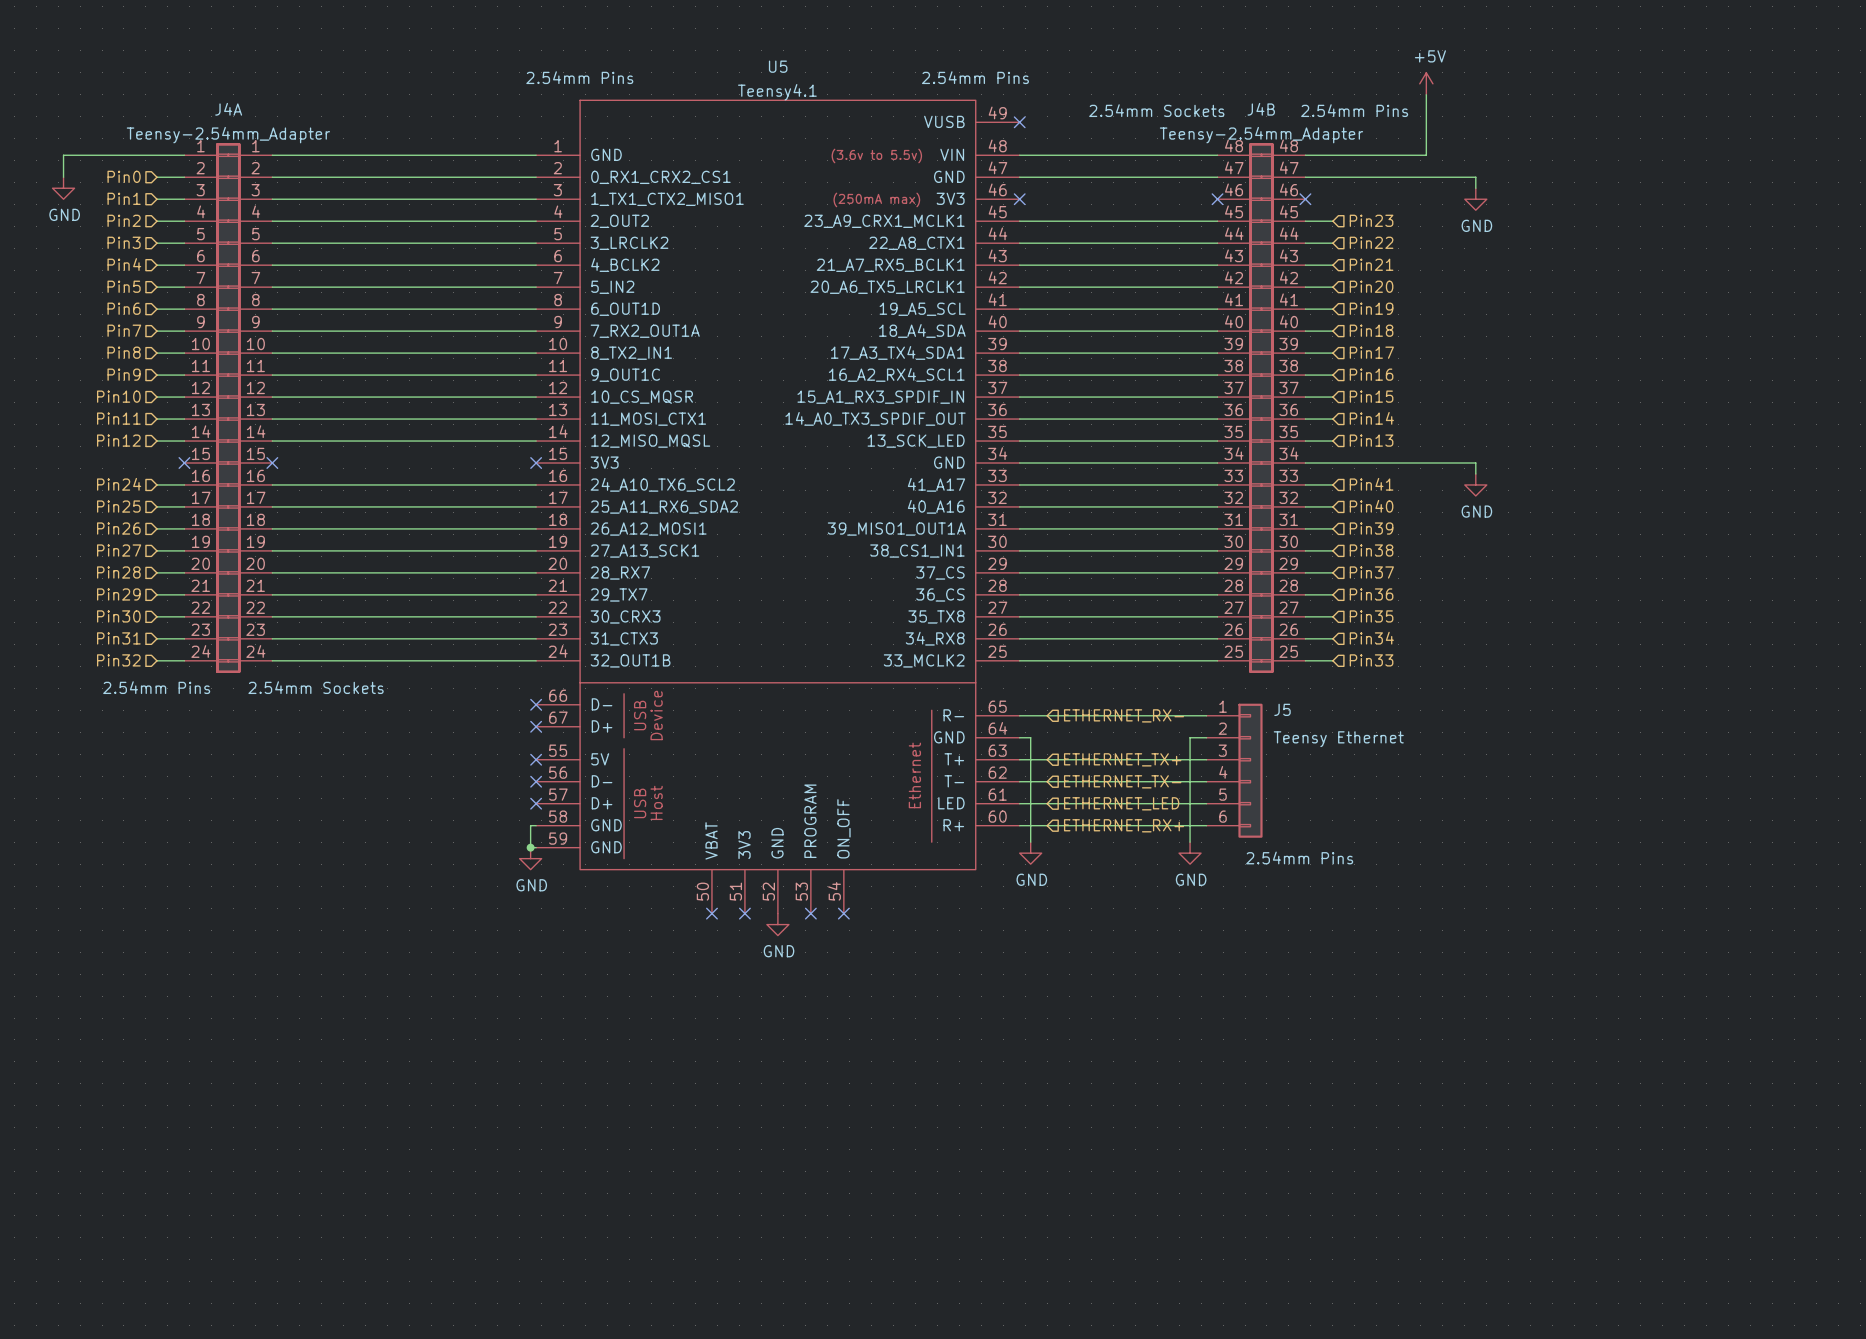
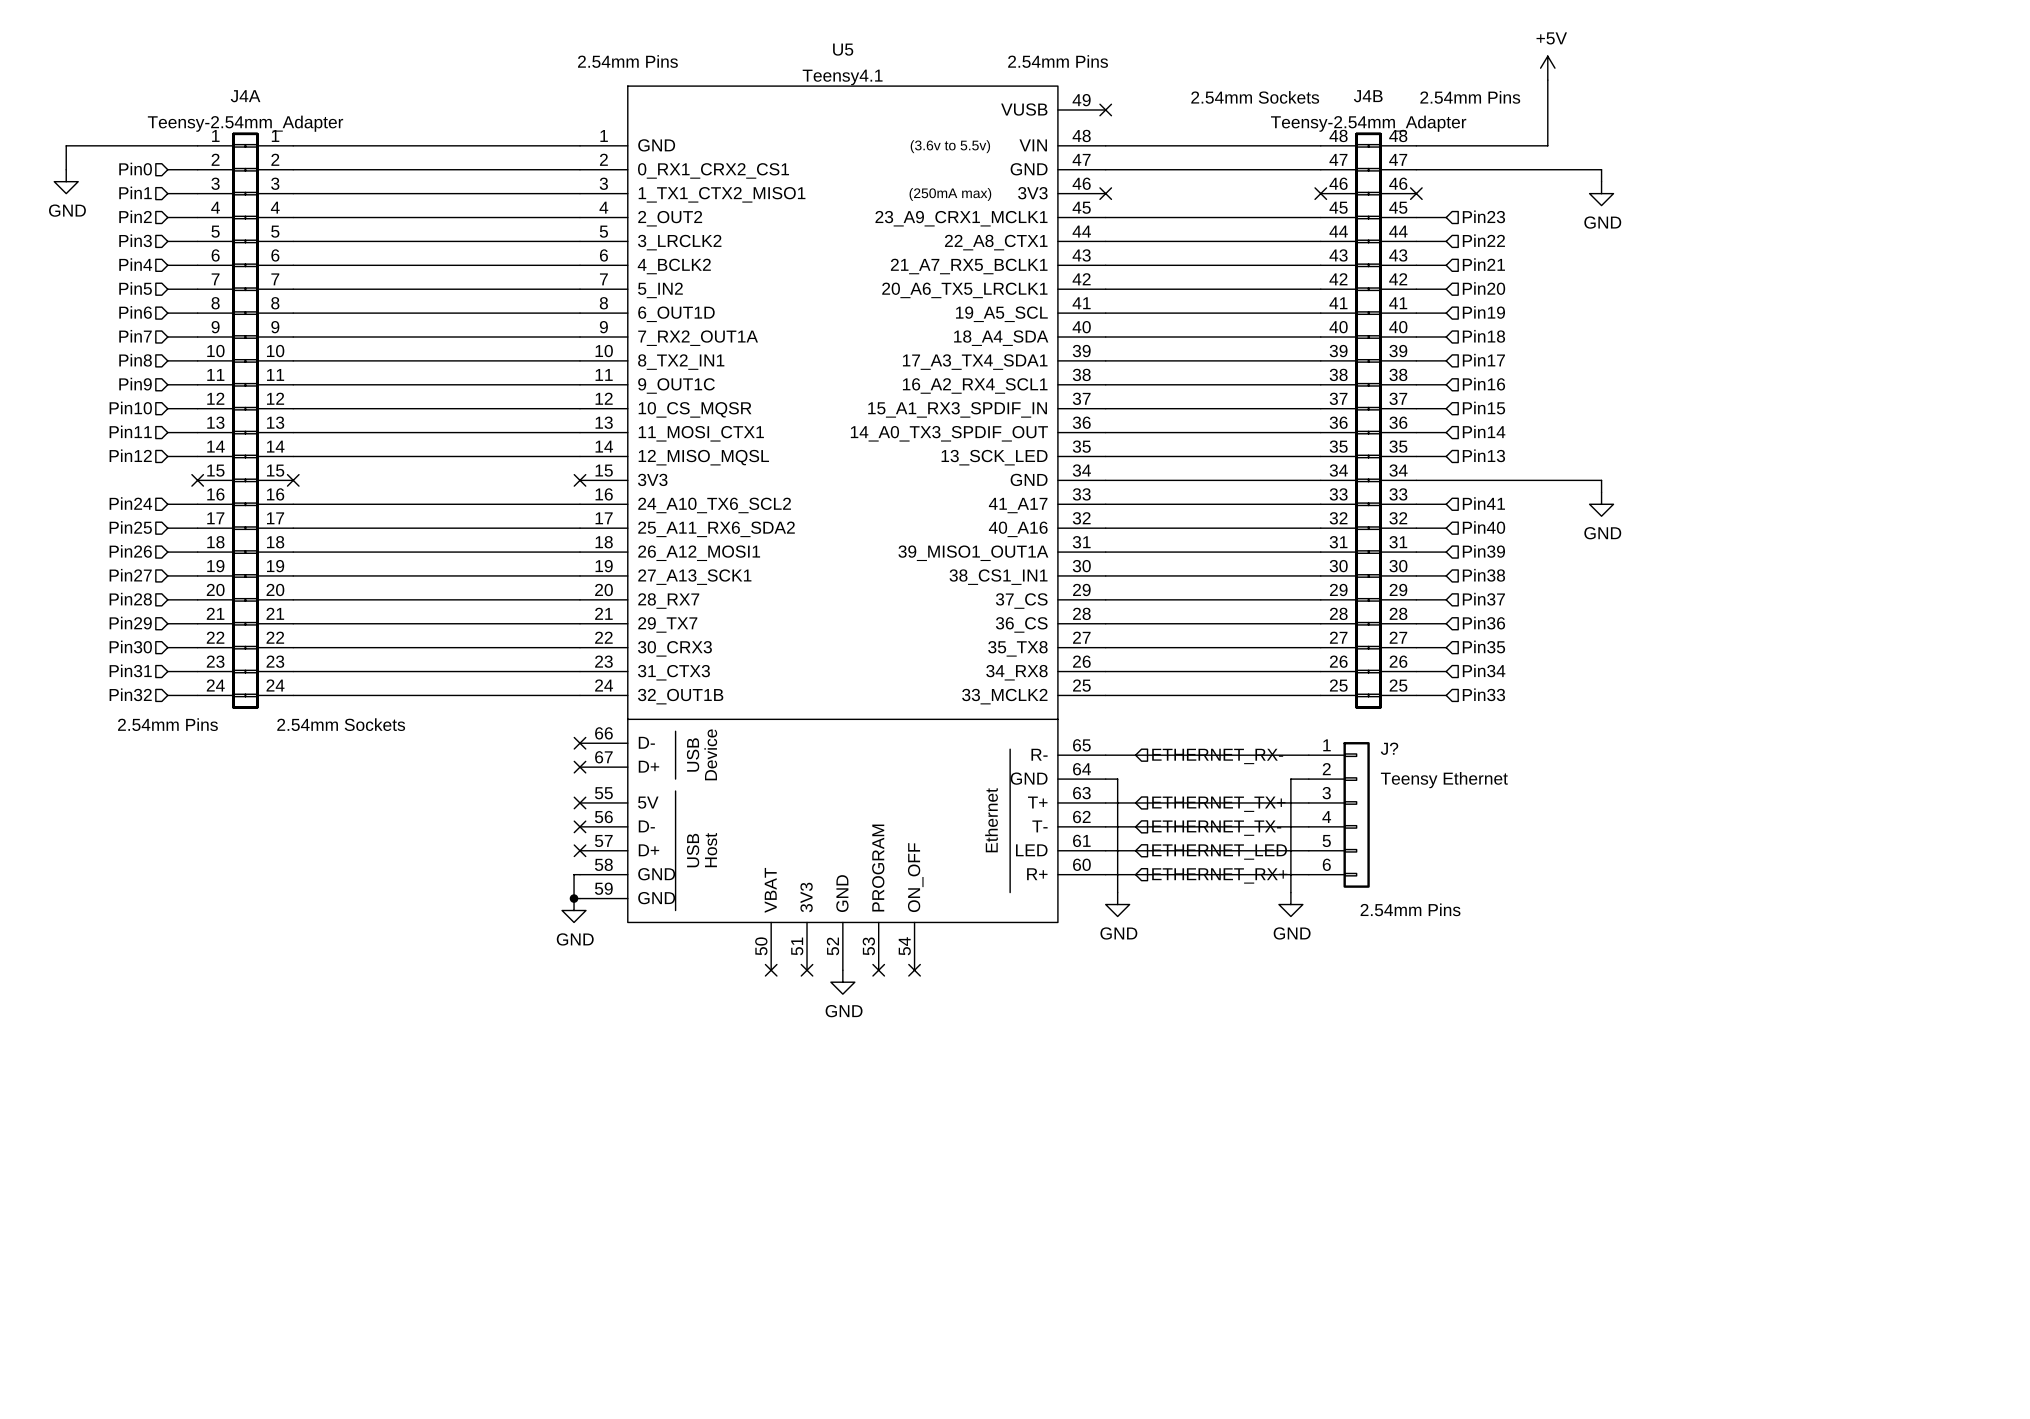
J5 name: J5 (1282, 709) -> J? (1389, 748)

